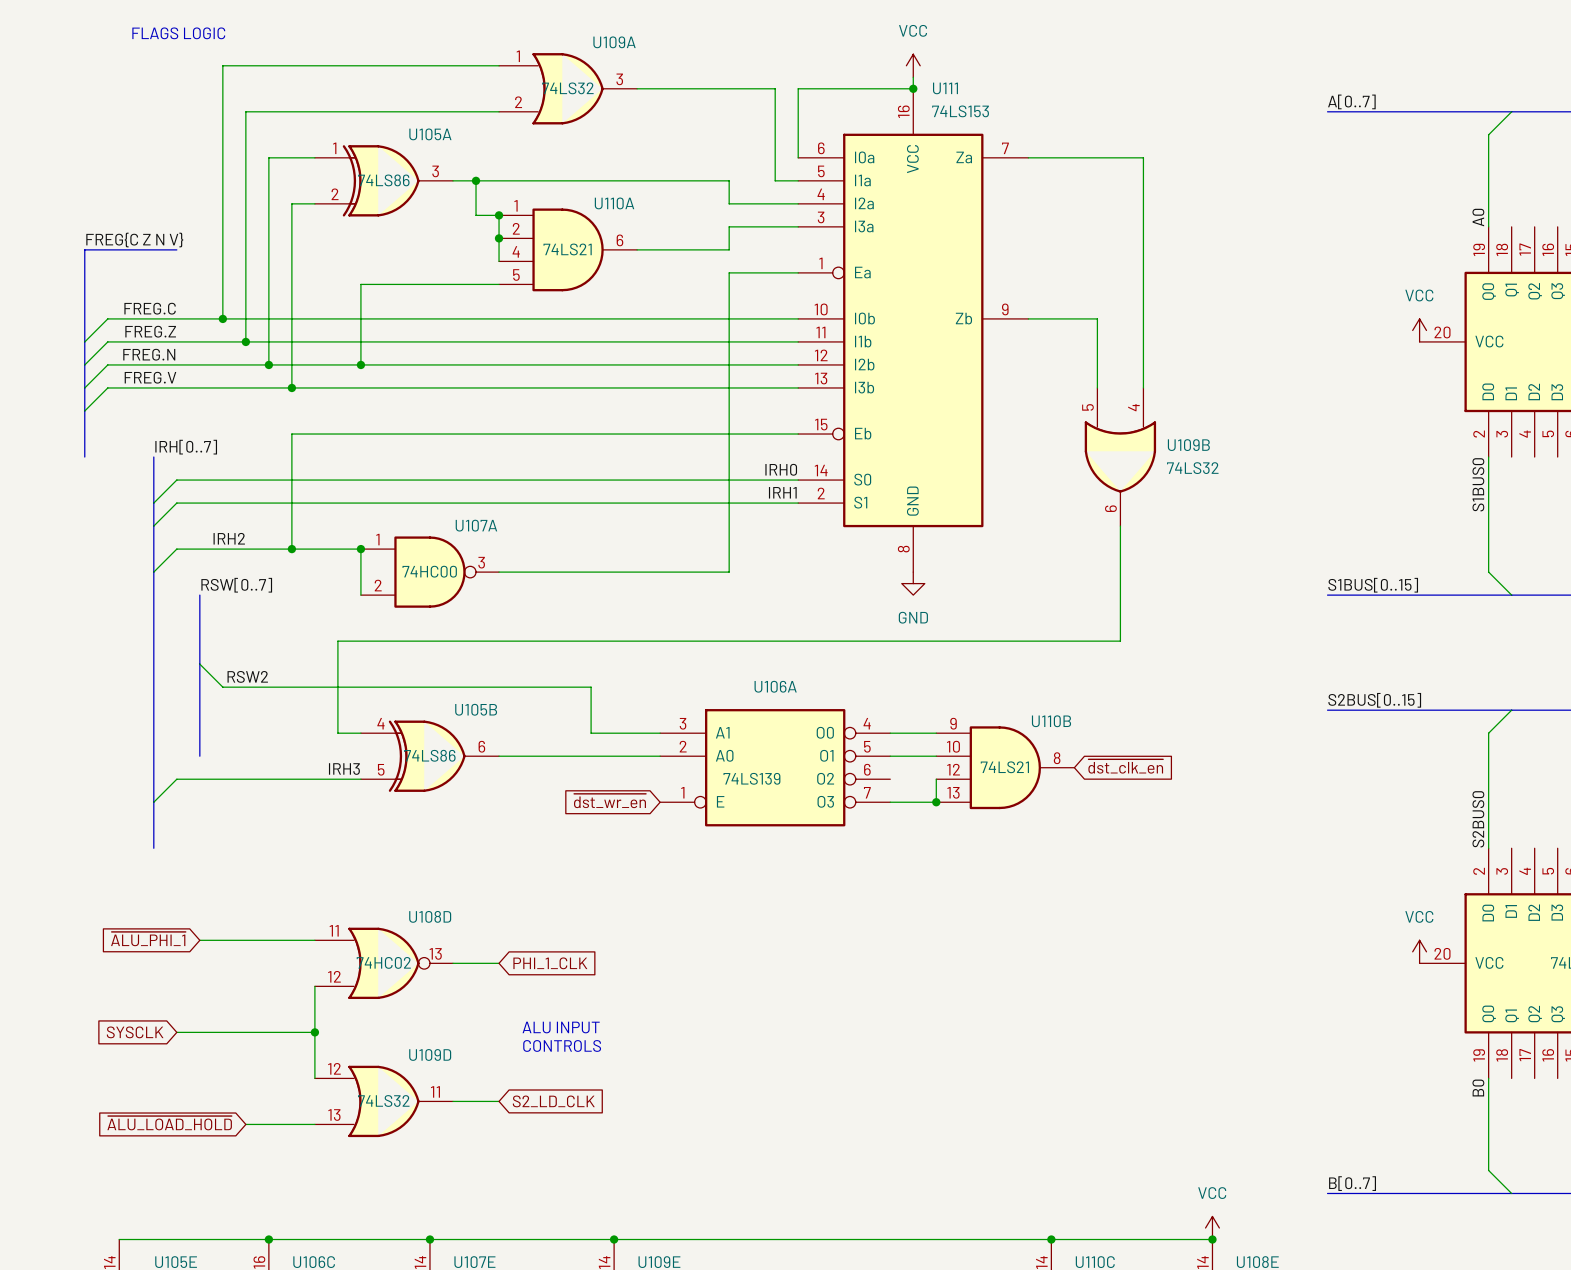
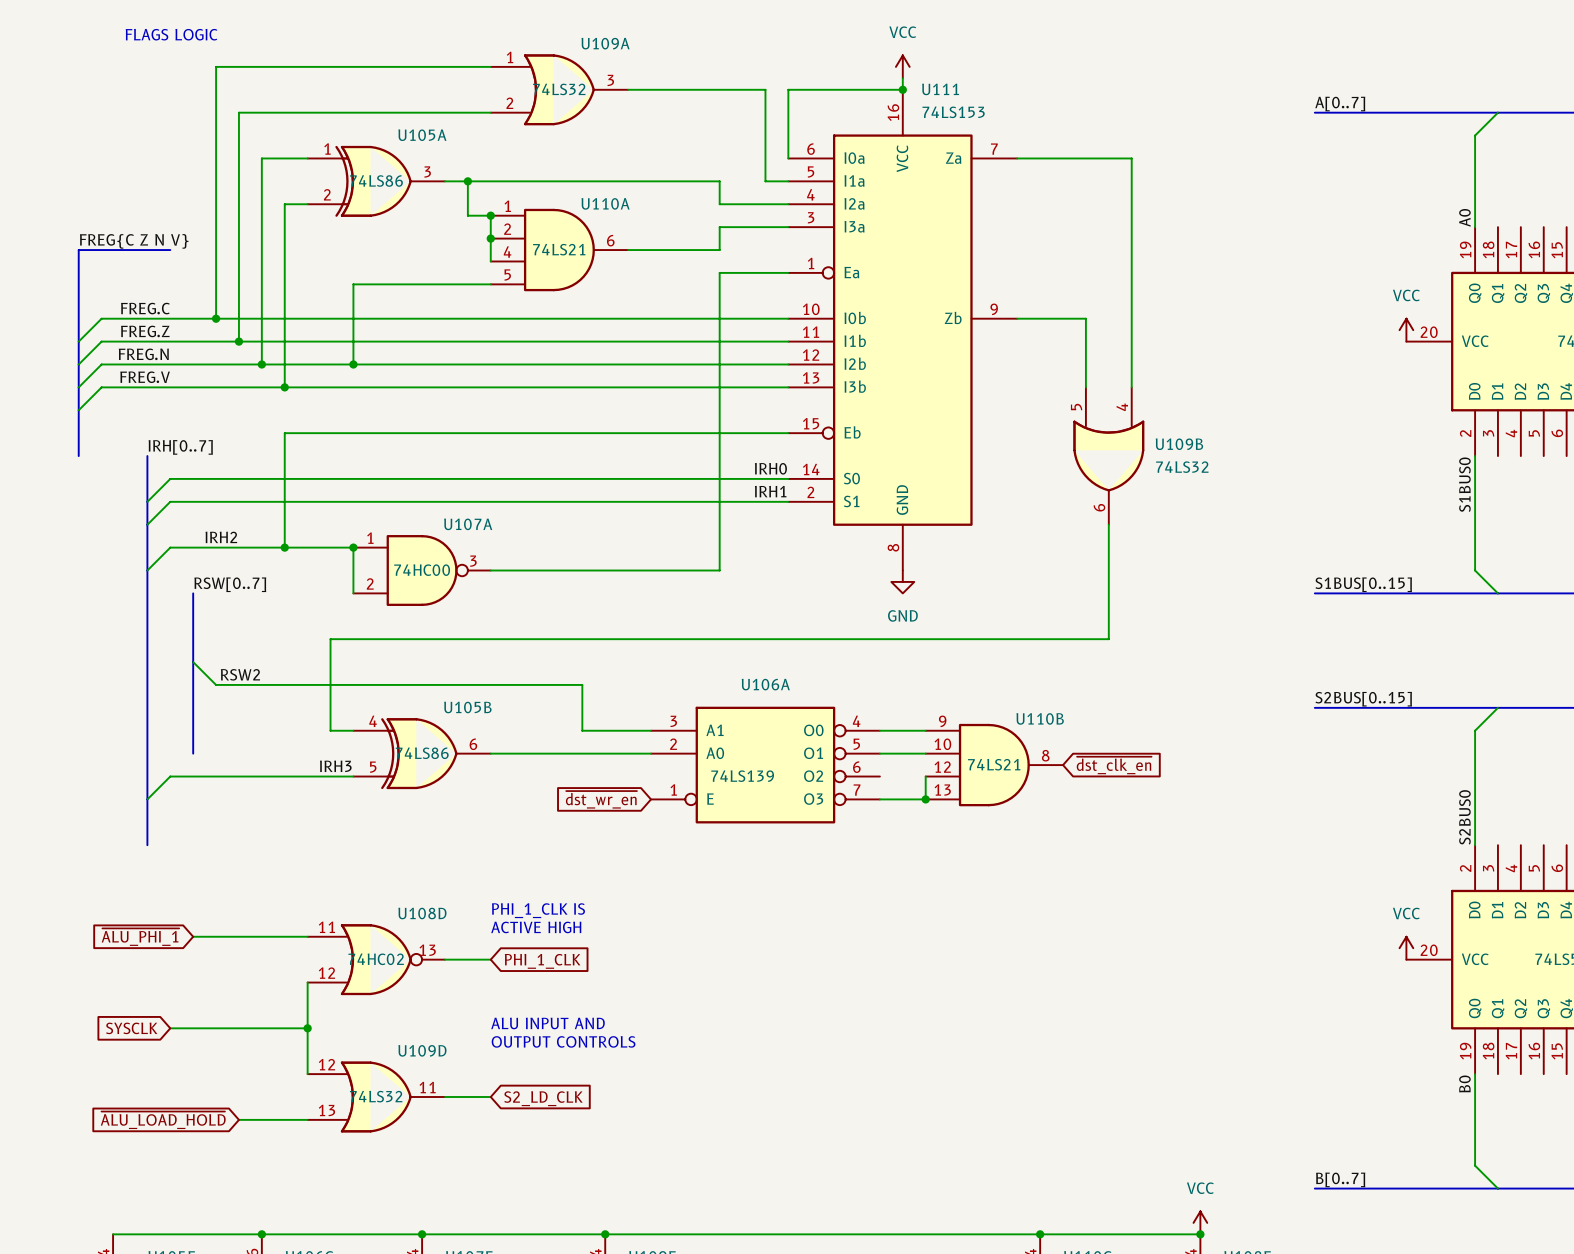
text: none -> PHI_1_CLK IS (538, 910)
text: none -> ACTIVE HIGH (536, 927)
text: ALU INPUT (561, 1027) -> ALU INPUT AND (548, 1023)
text: CONTROLS (562, 1045) -> OUTPUT CONTROLS (563, 1041)

